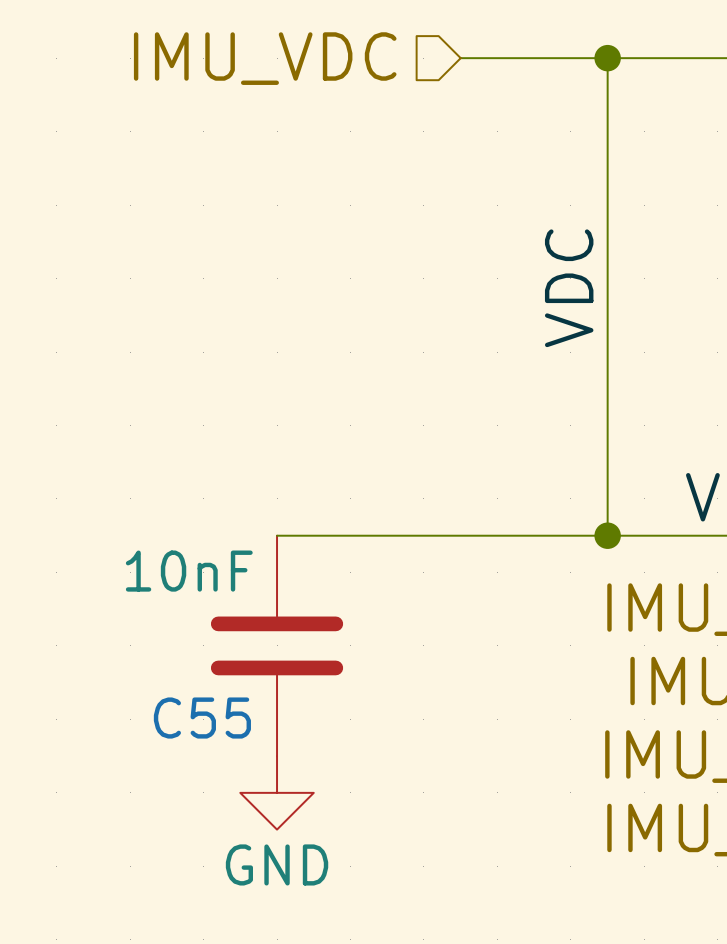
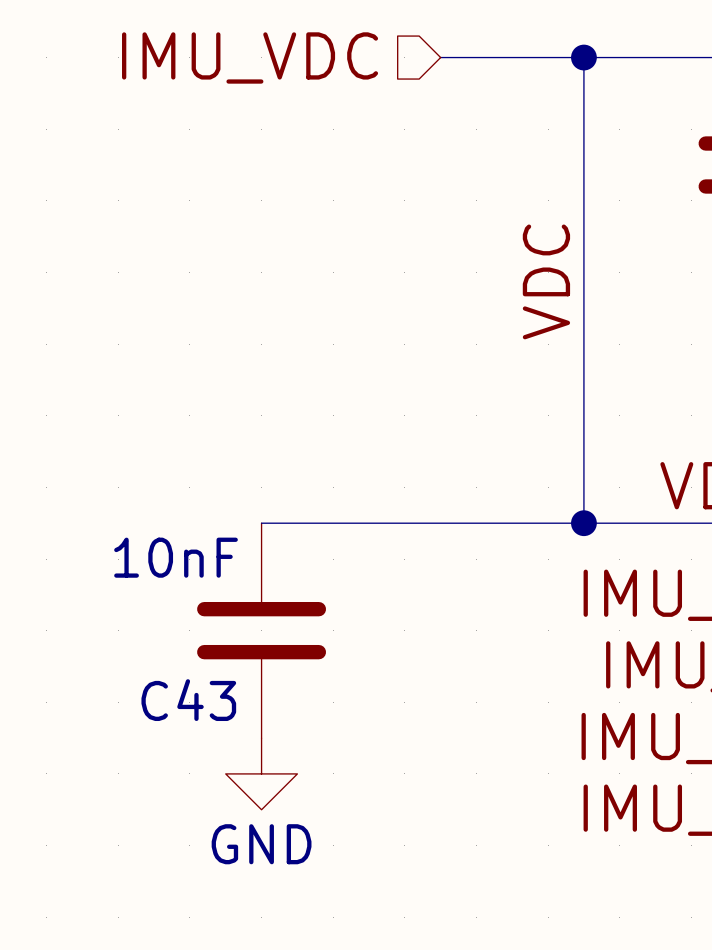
C55 name: C55 (202, 718) -> C43 (188, 700)

